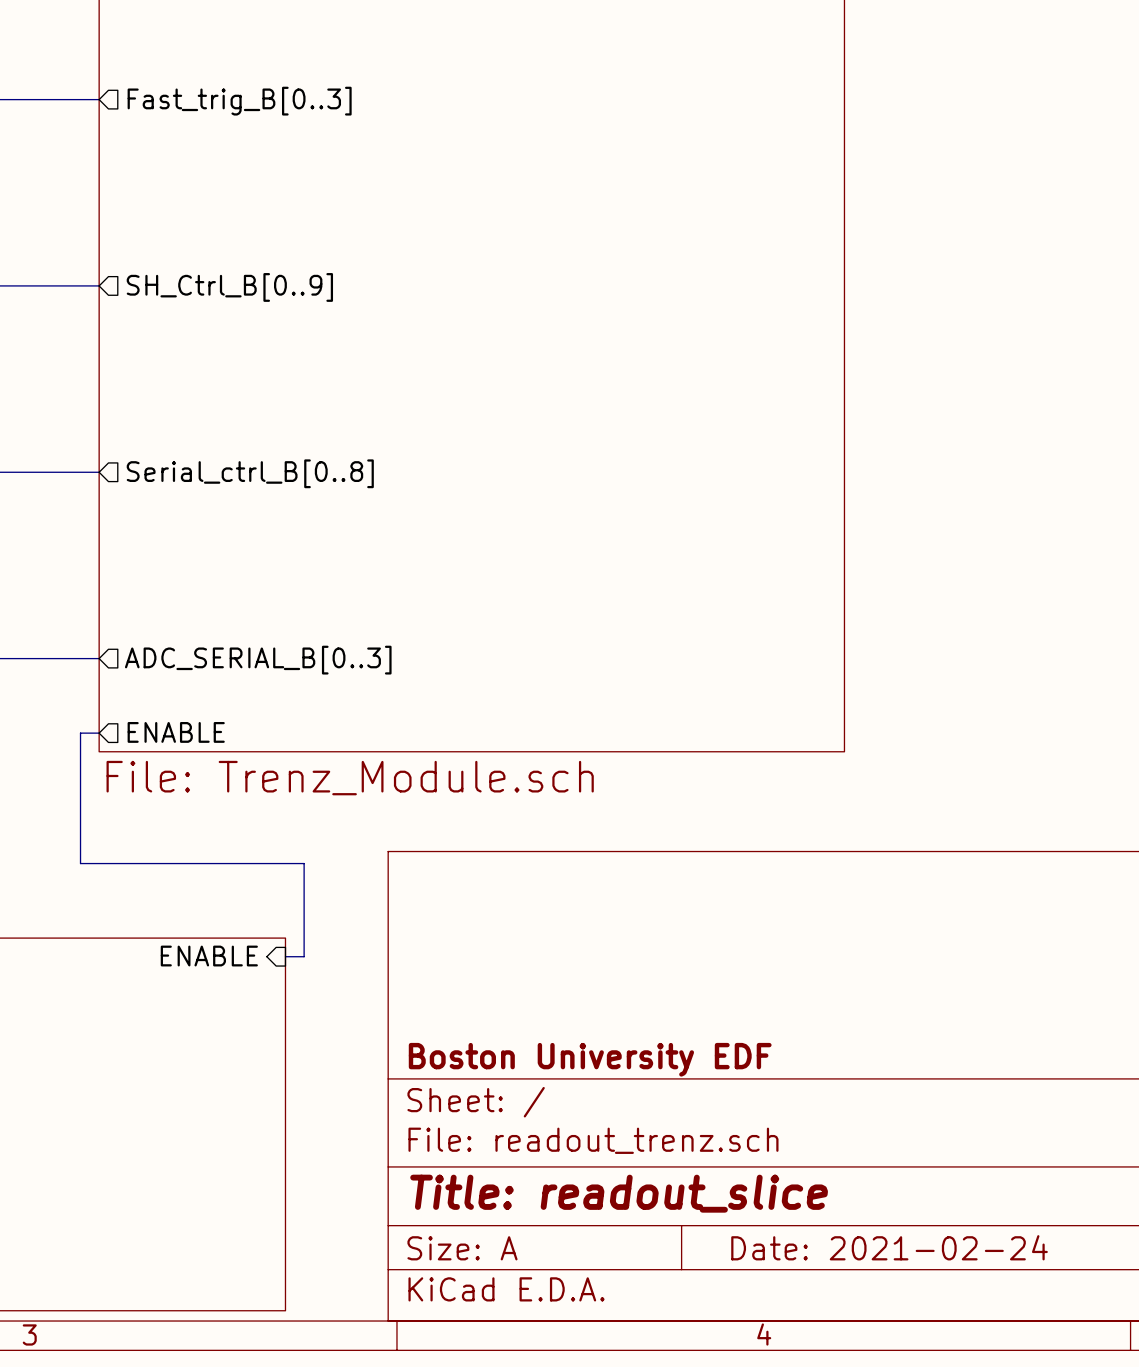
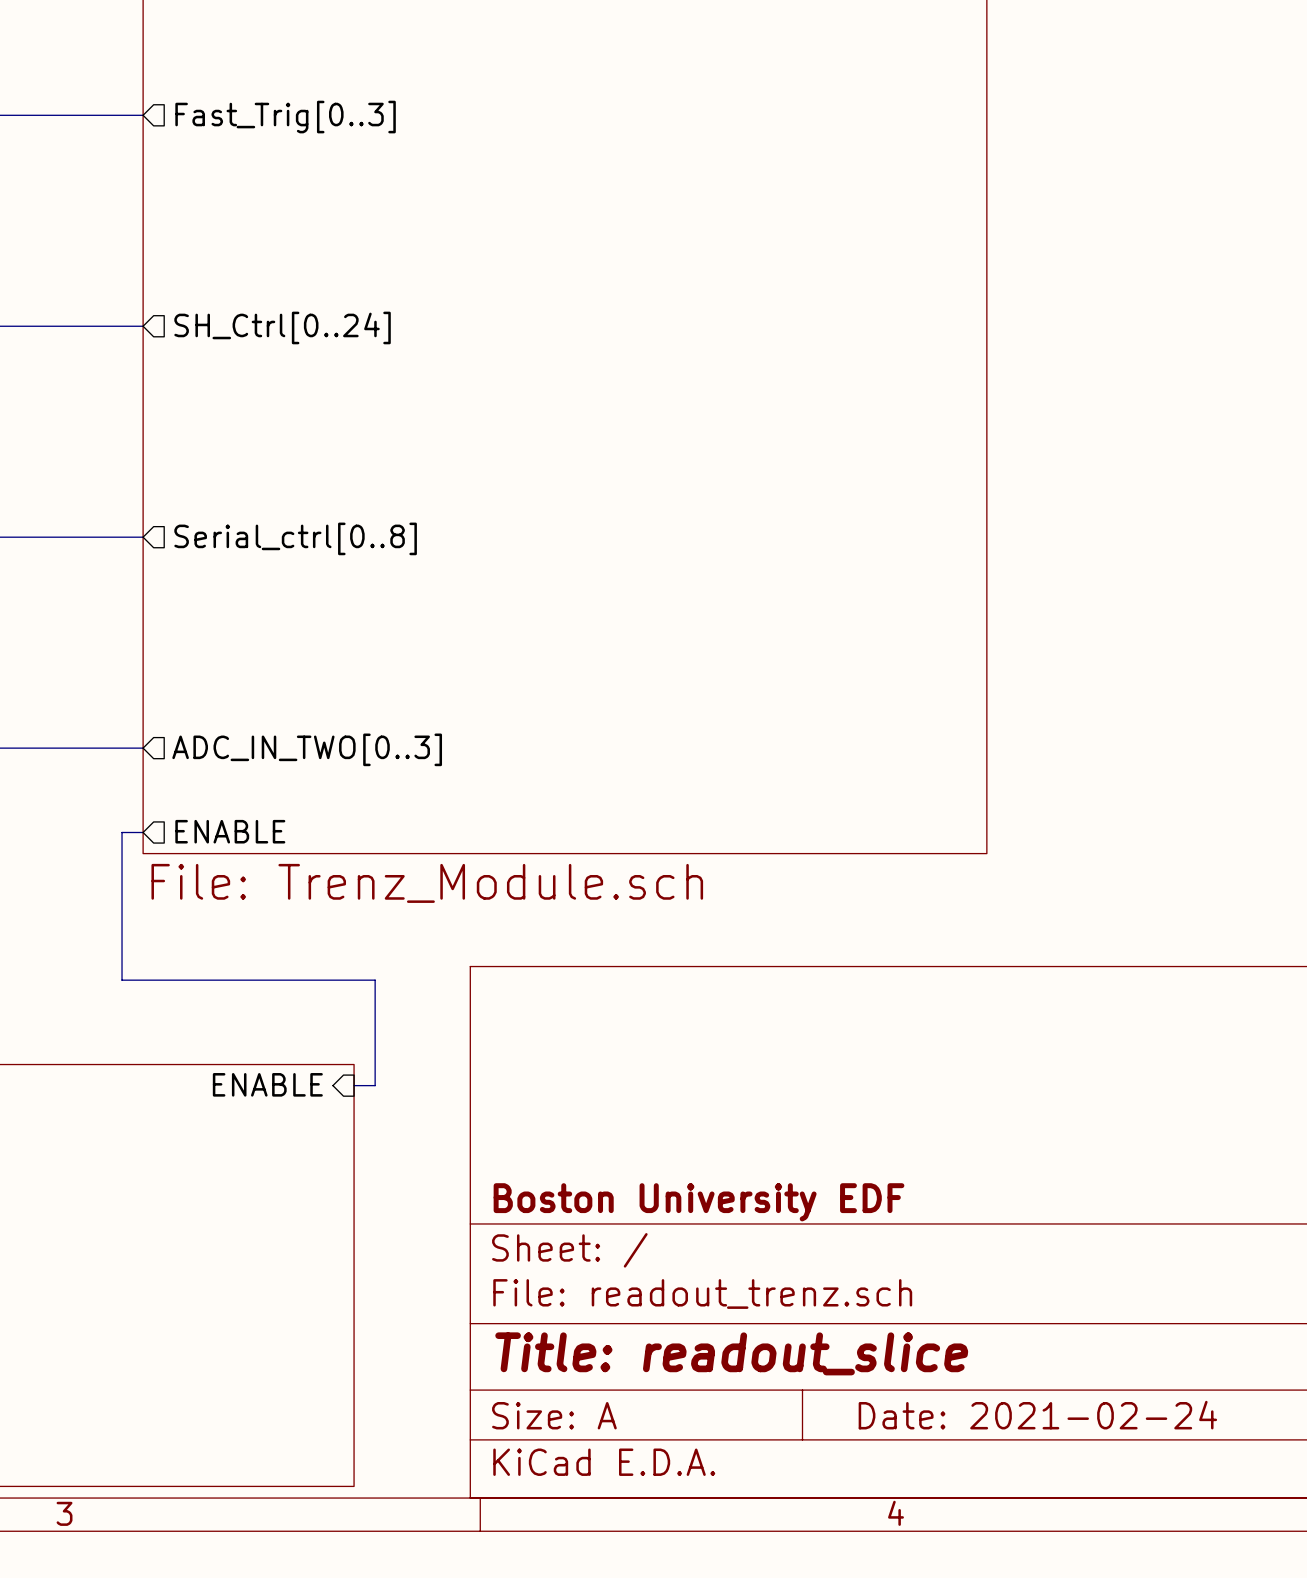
sheet pin: Fast_trig_B[0..3] (239, 101) -> Fast_Trig[0..3] (285, 117)
sheet pin: SH_Ctrl_B[0..9] (229, 287) -> SH_Ctrl[0..24] (282, 327)
sheet pin: Serial_ctrl_B[0..8] (250, 473) -> Serial_ctrl[0..8] (295, 538)
sheet pin: ADC_SERIAL_B[0..3] (258, 660) -> ADC_IN_TWO[0..3] (307, 749)

